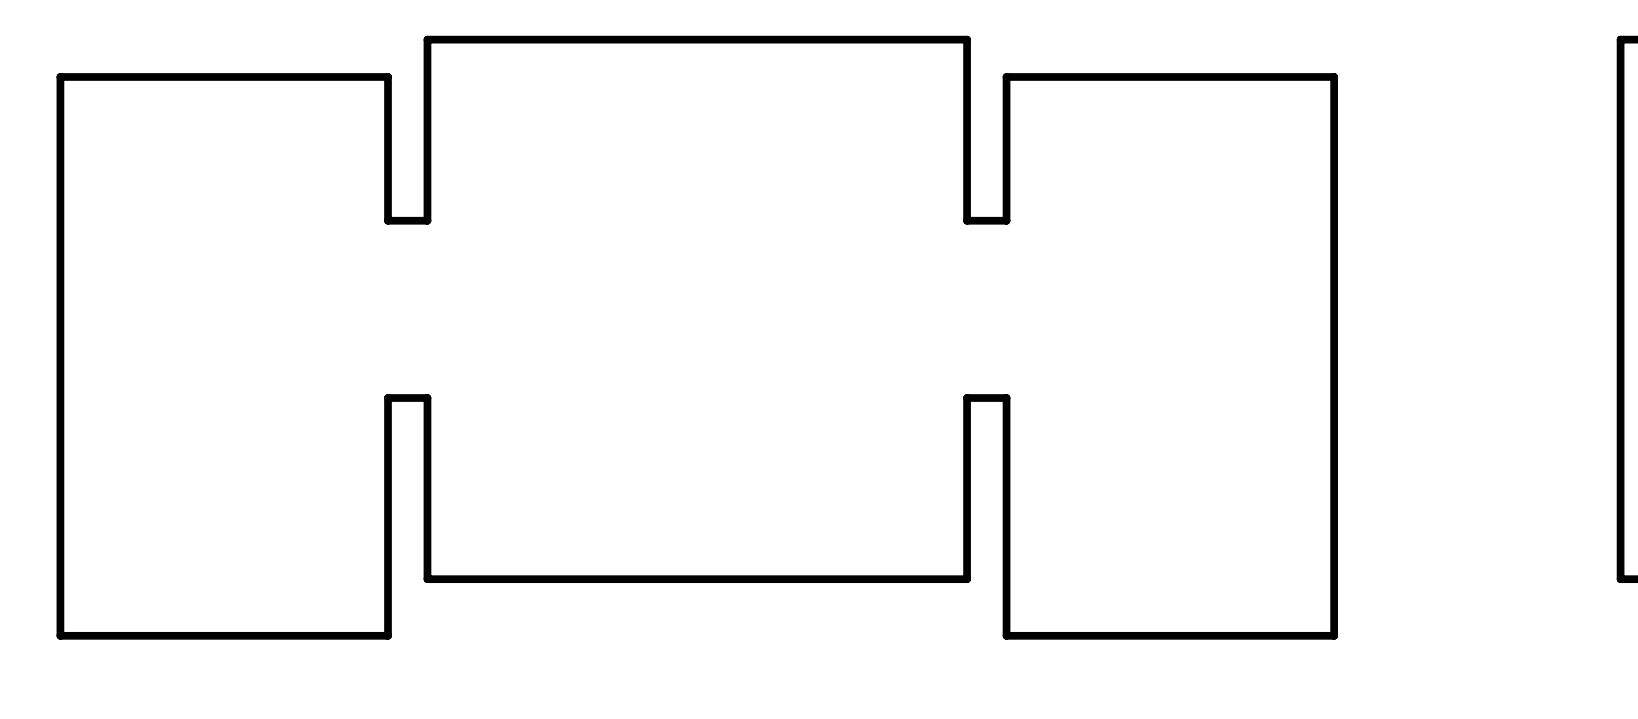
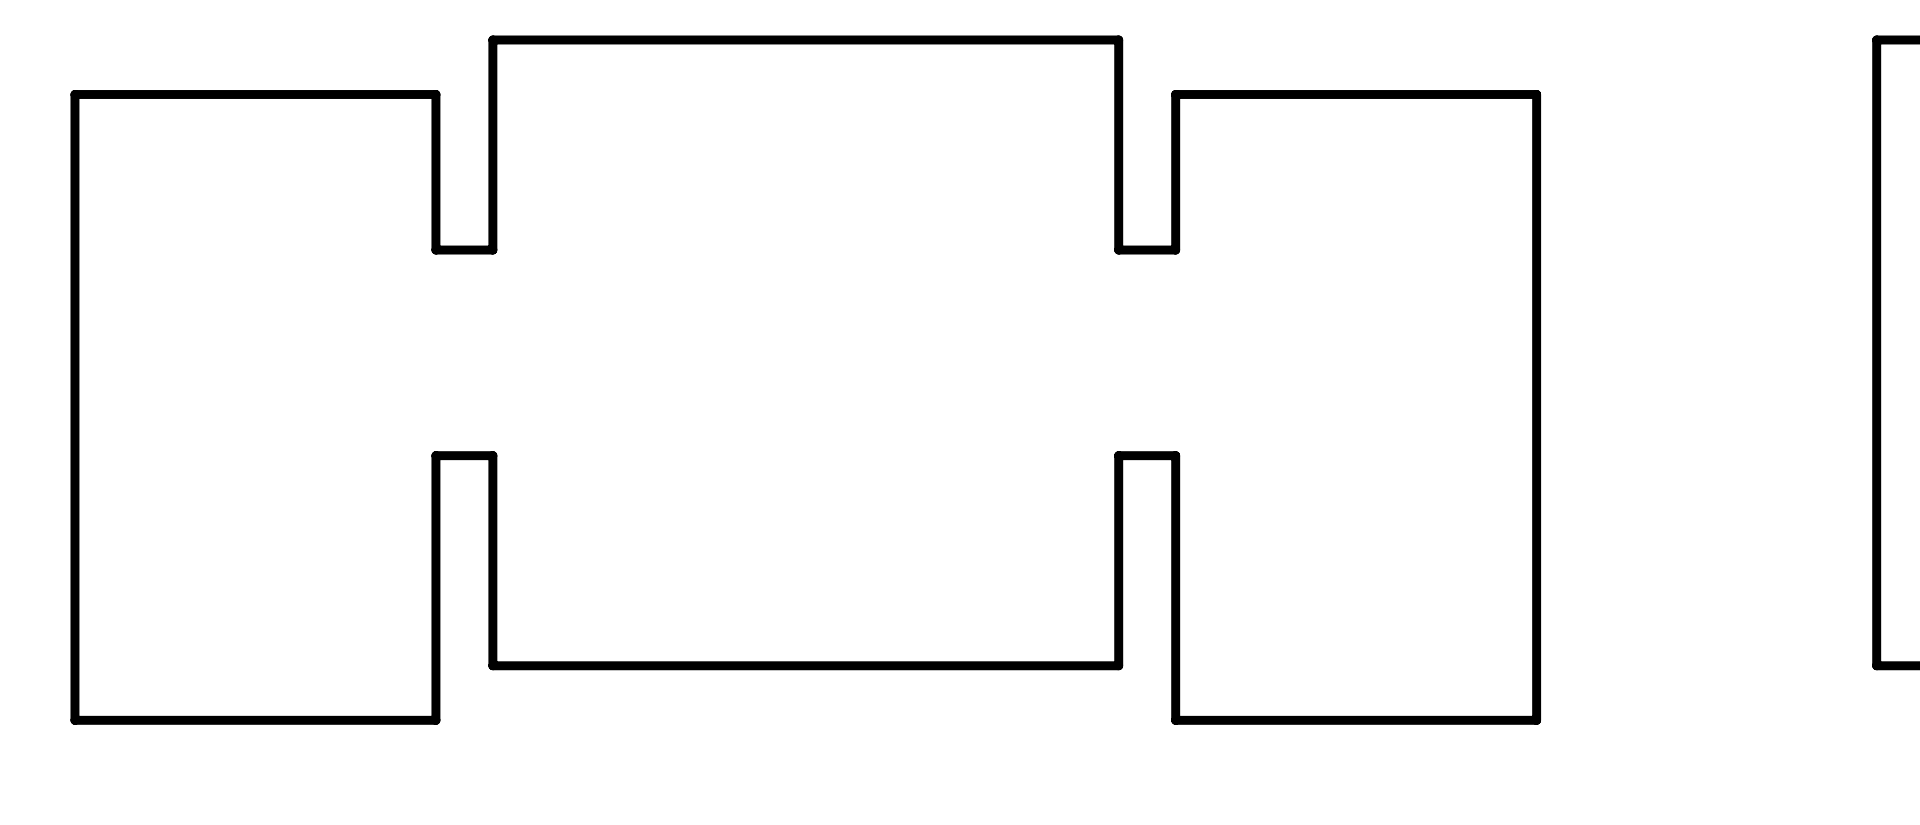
board edge: (388, 220) (388, 76) (60, 76) (60, 635) (388, 635) (388, 398) -> (447, 250) (435, 250) (435, 94) (74, 94) (74, 720) (435, 720) (435, 455) (447, 455)
board edge: (1006, 220) (1006, 76) (1334, 76) (1334, 635) (1006, 635) (1006, 398) (967, 398) -> (1164, 250) (1175, 250) (1175, 94) (1536, 94) (1536, 720) (1175, 720) (1175, 455) (1118, 455)

